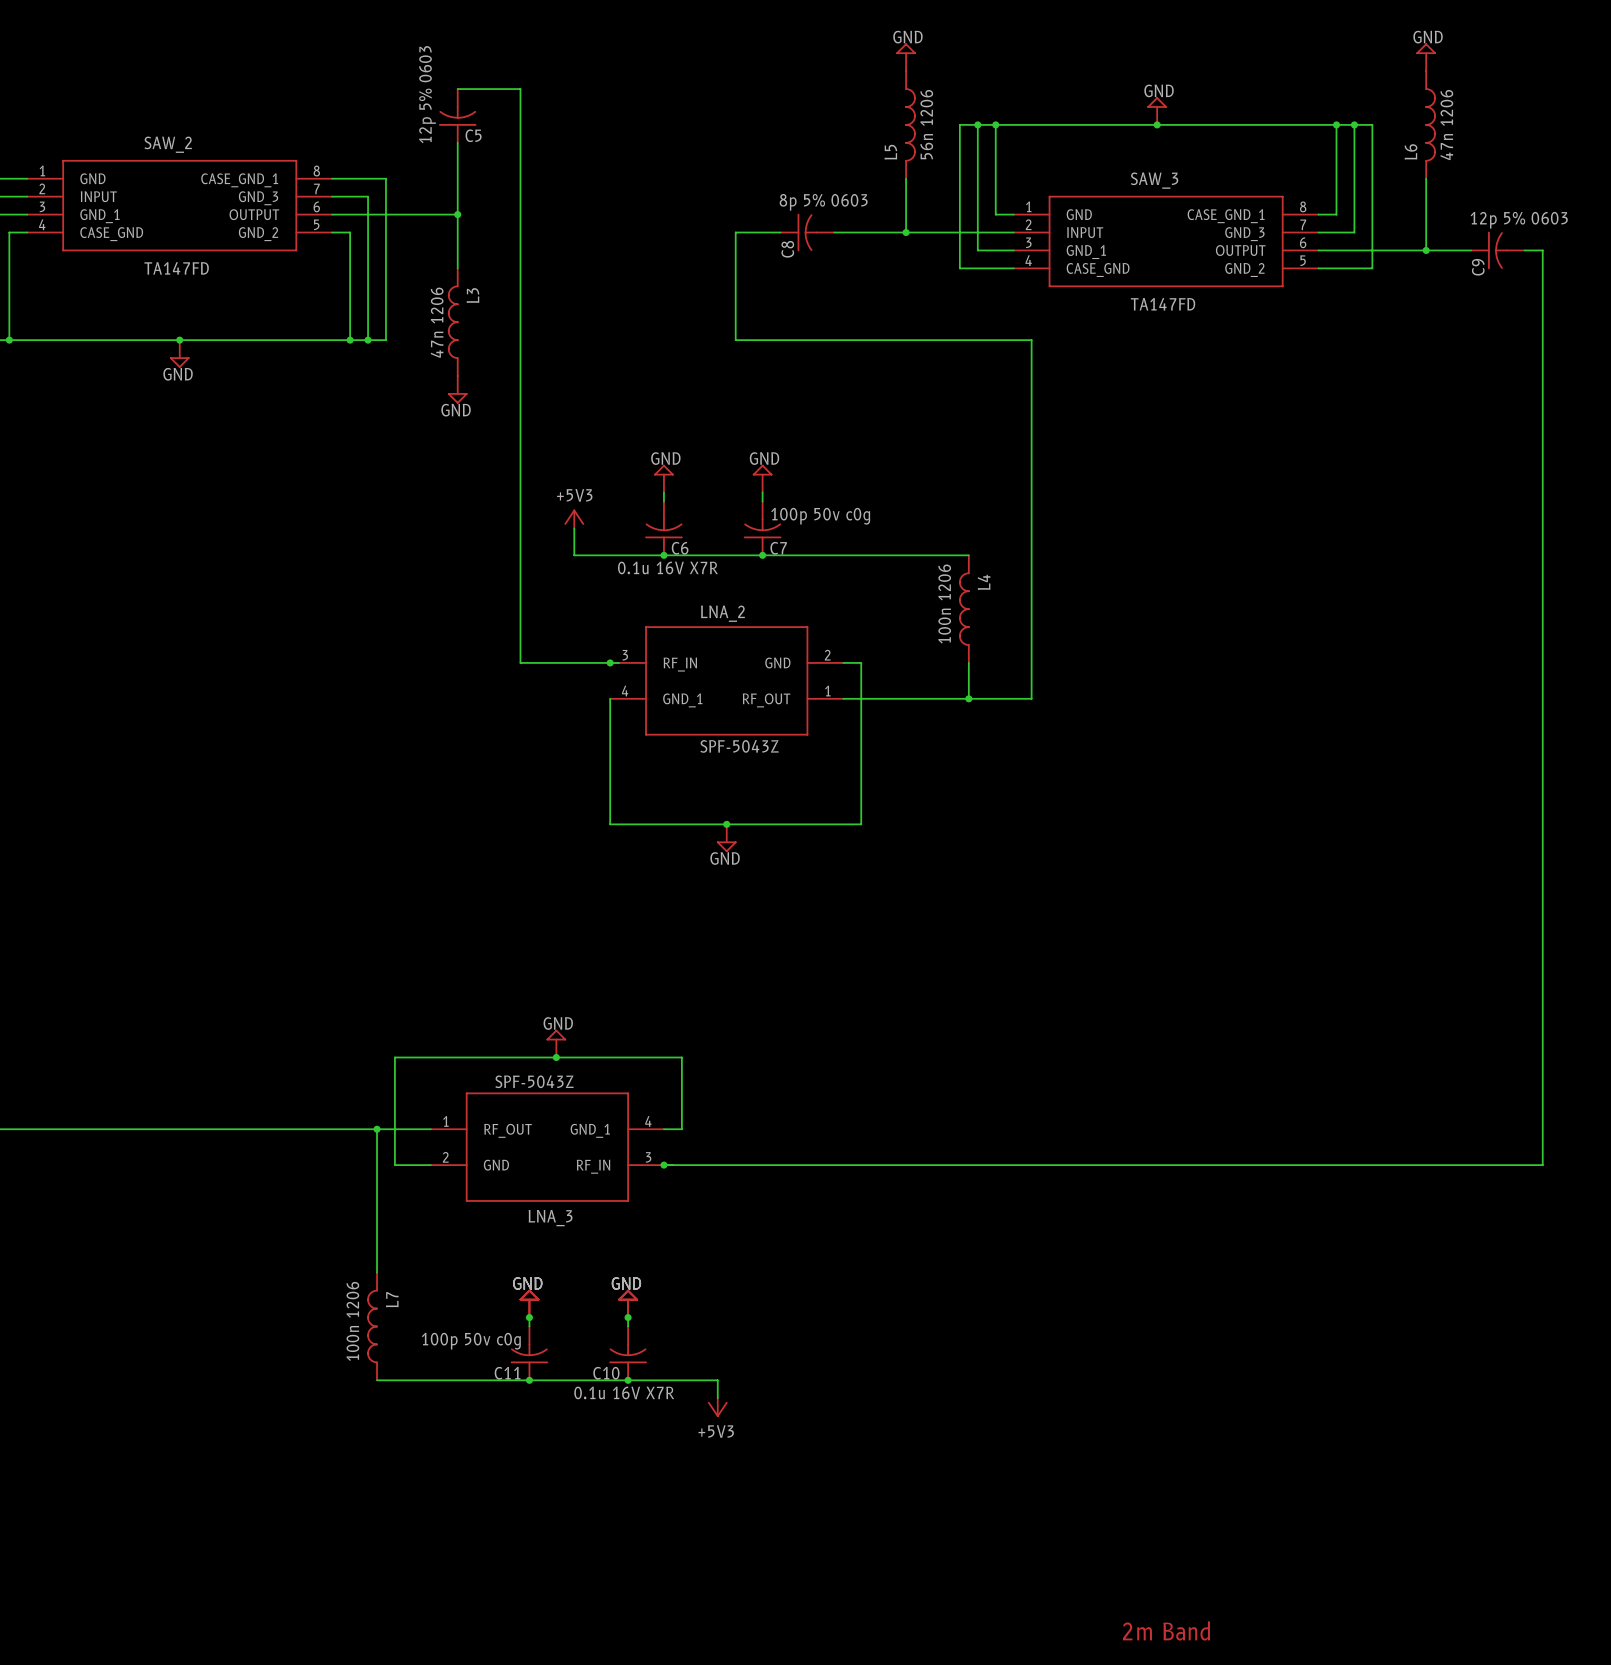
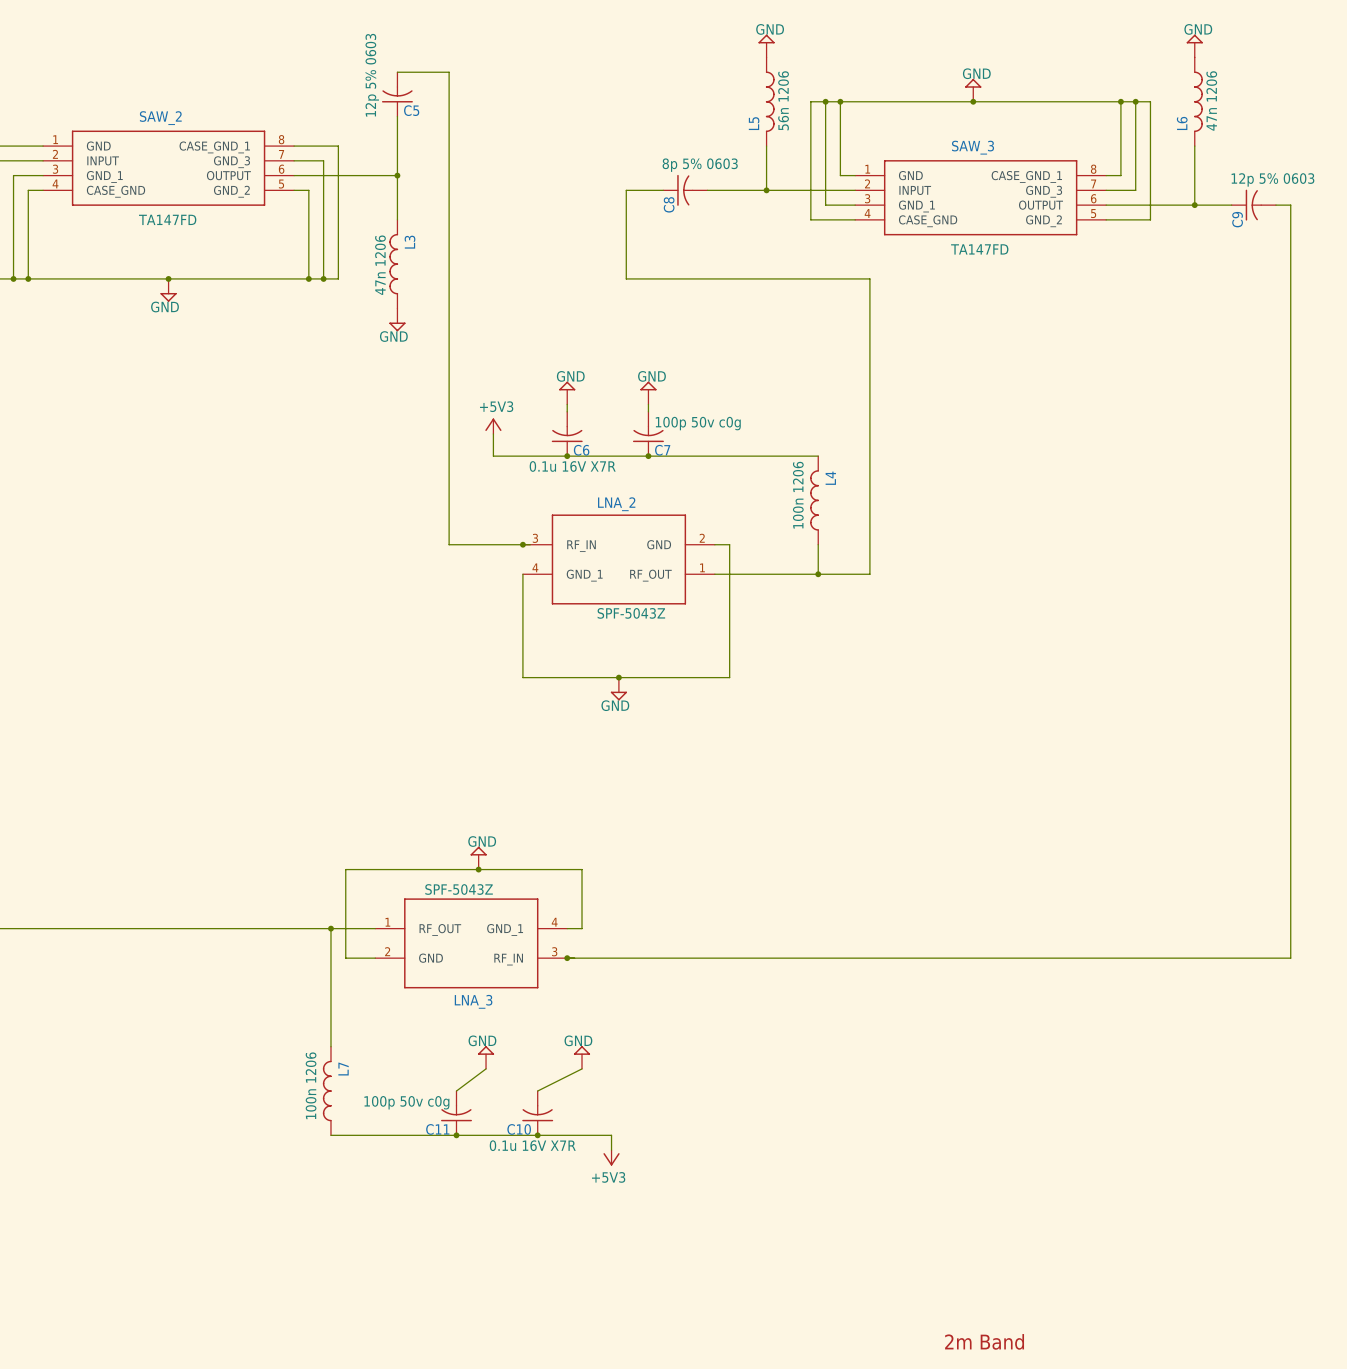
power symbol: none -> GND (486, 1057)
power symbol: none -> GND (582, 1057)
power symbol: GND (529, 1303) -> none
power symbol: GND (628, 1303) -> none
wire: (529, 1317) (529, 1326) -> (486, 1068) (456, 1091)
junction: (529, 1317) -> none
wire: (628, 1317) (628, 1326) -> (582, 1068) (537, 1091)
junction: (628, 1317) -> none

